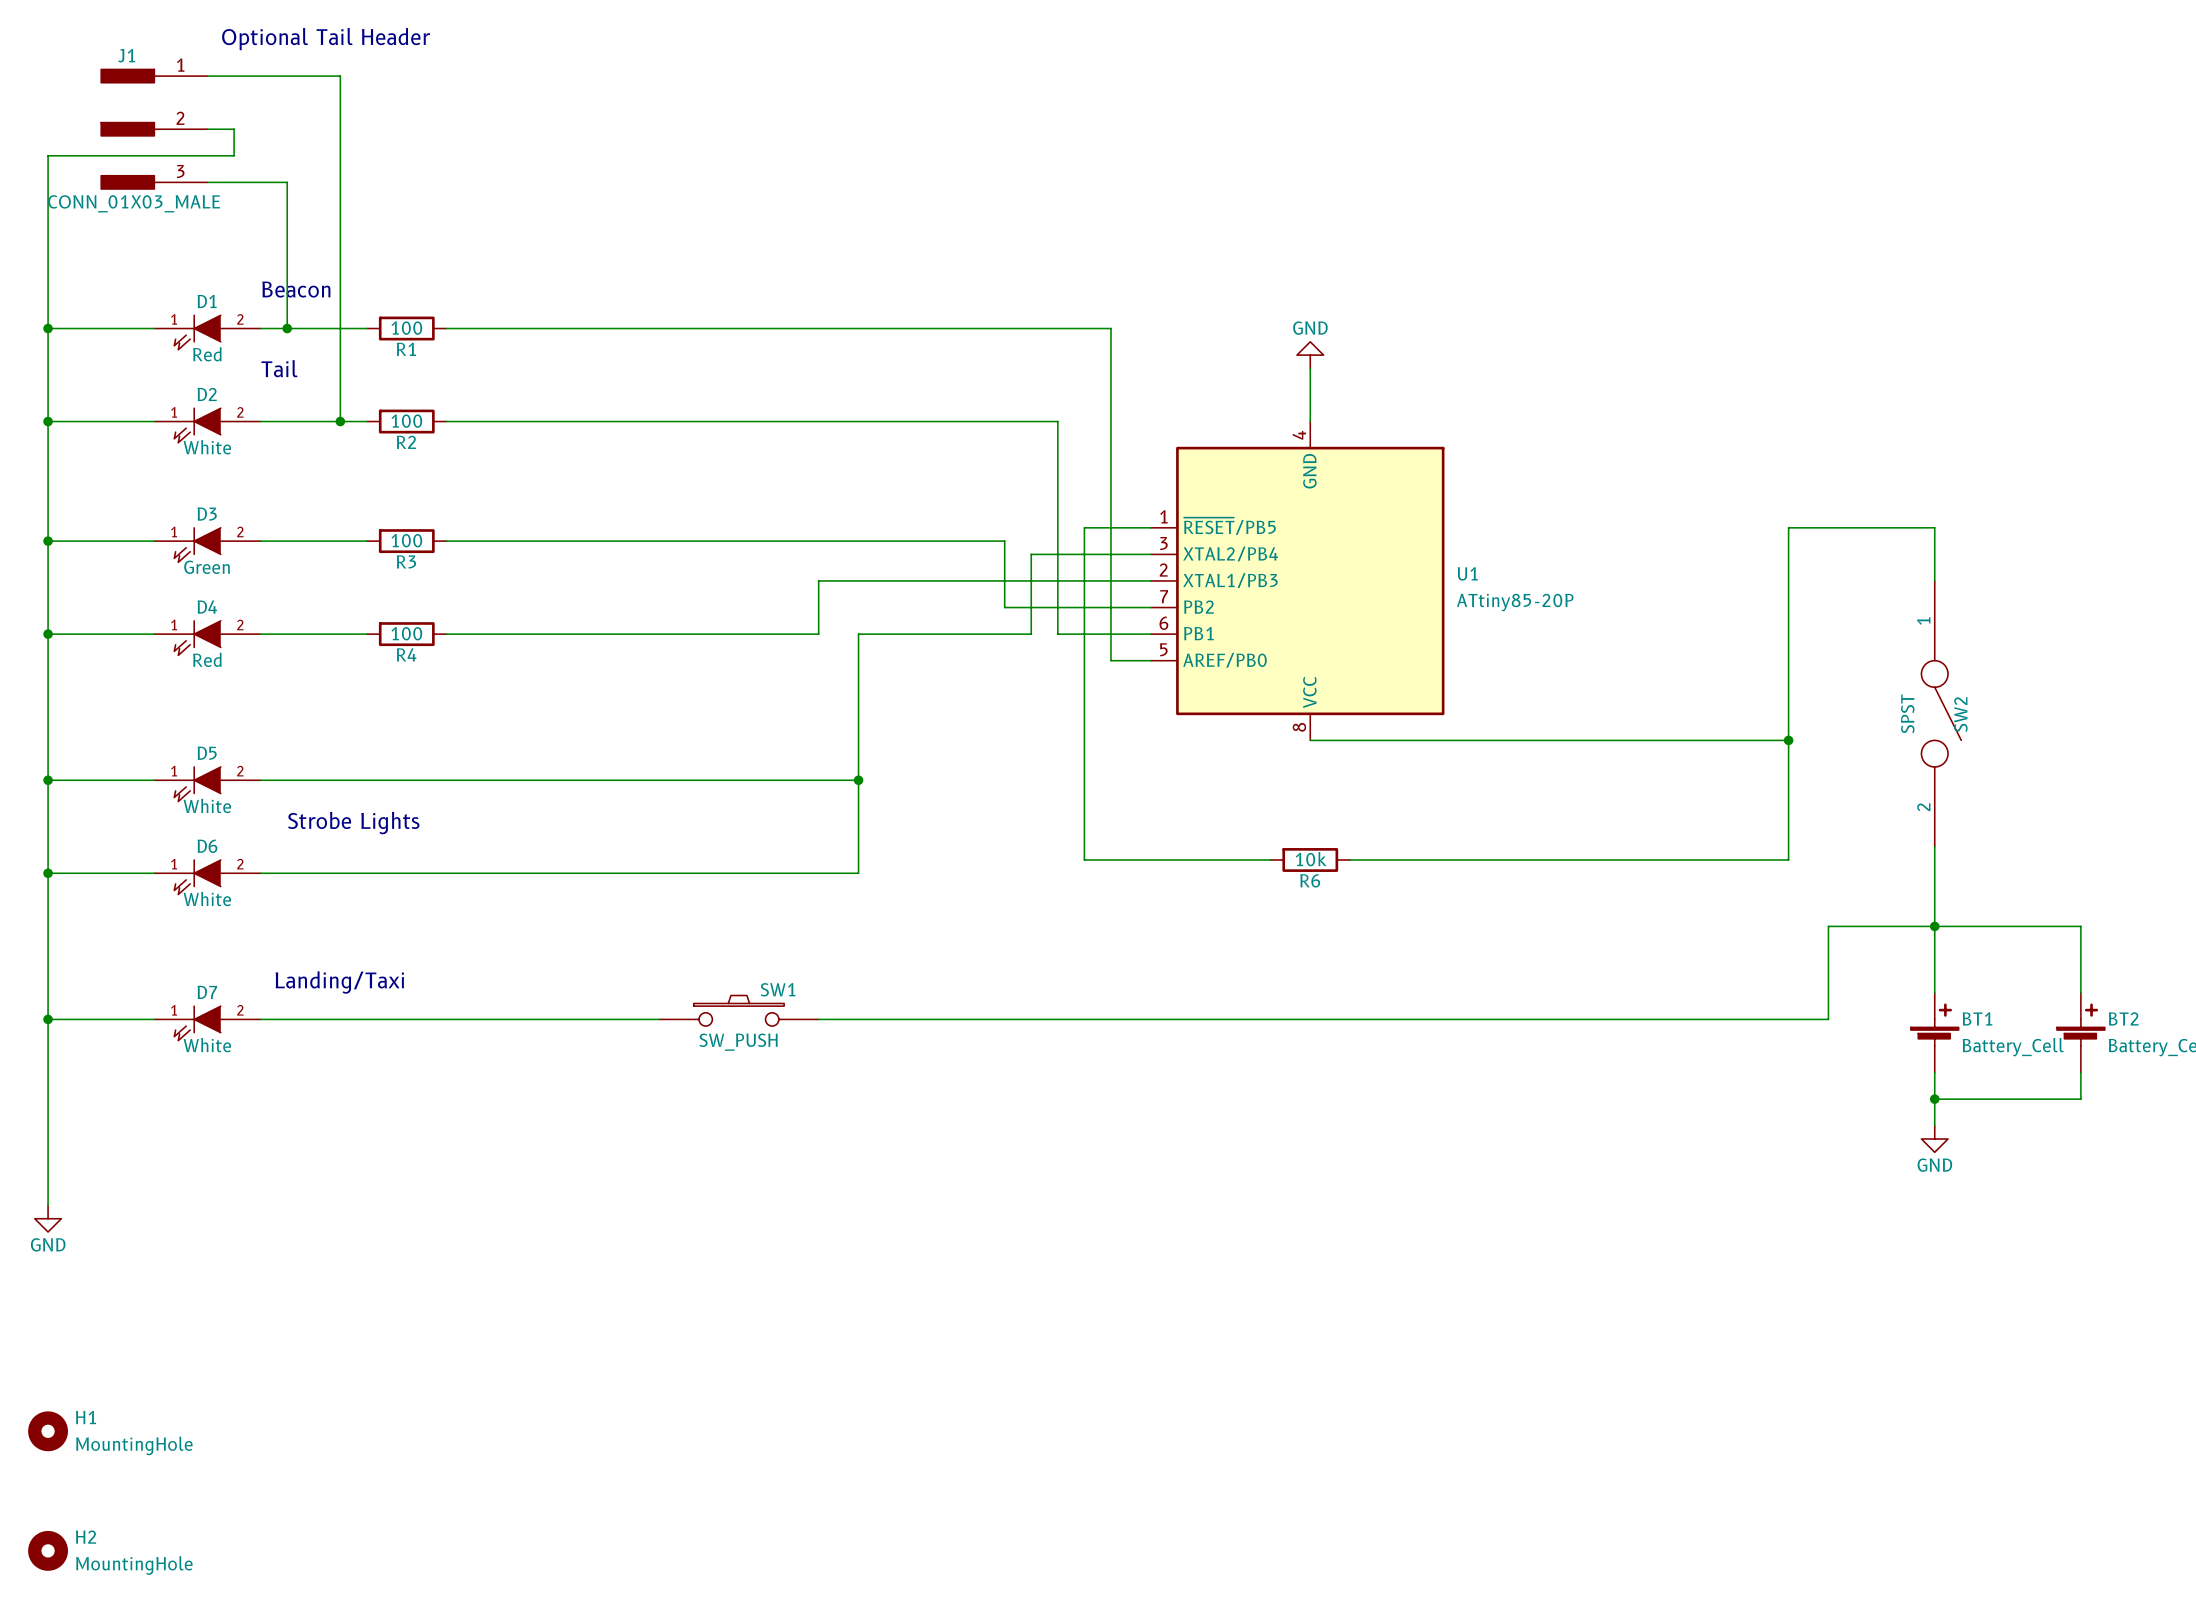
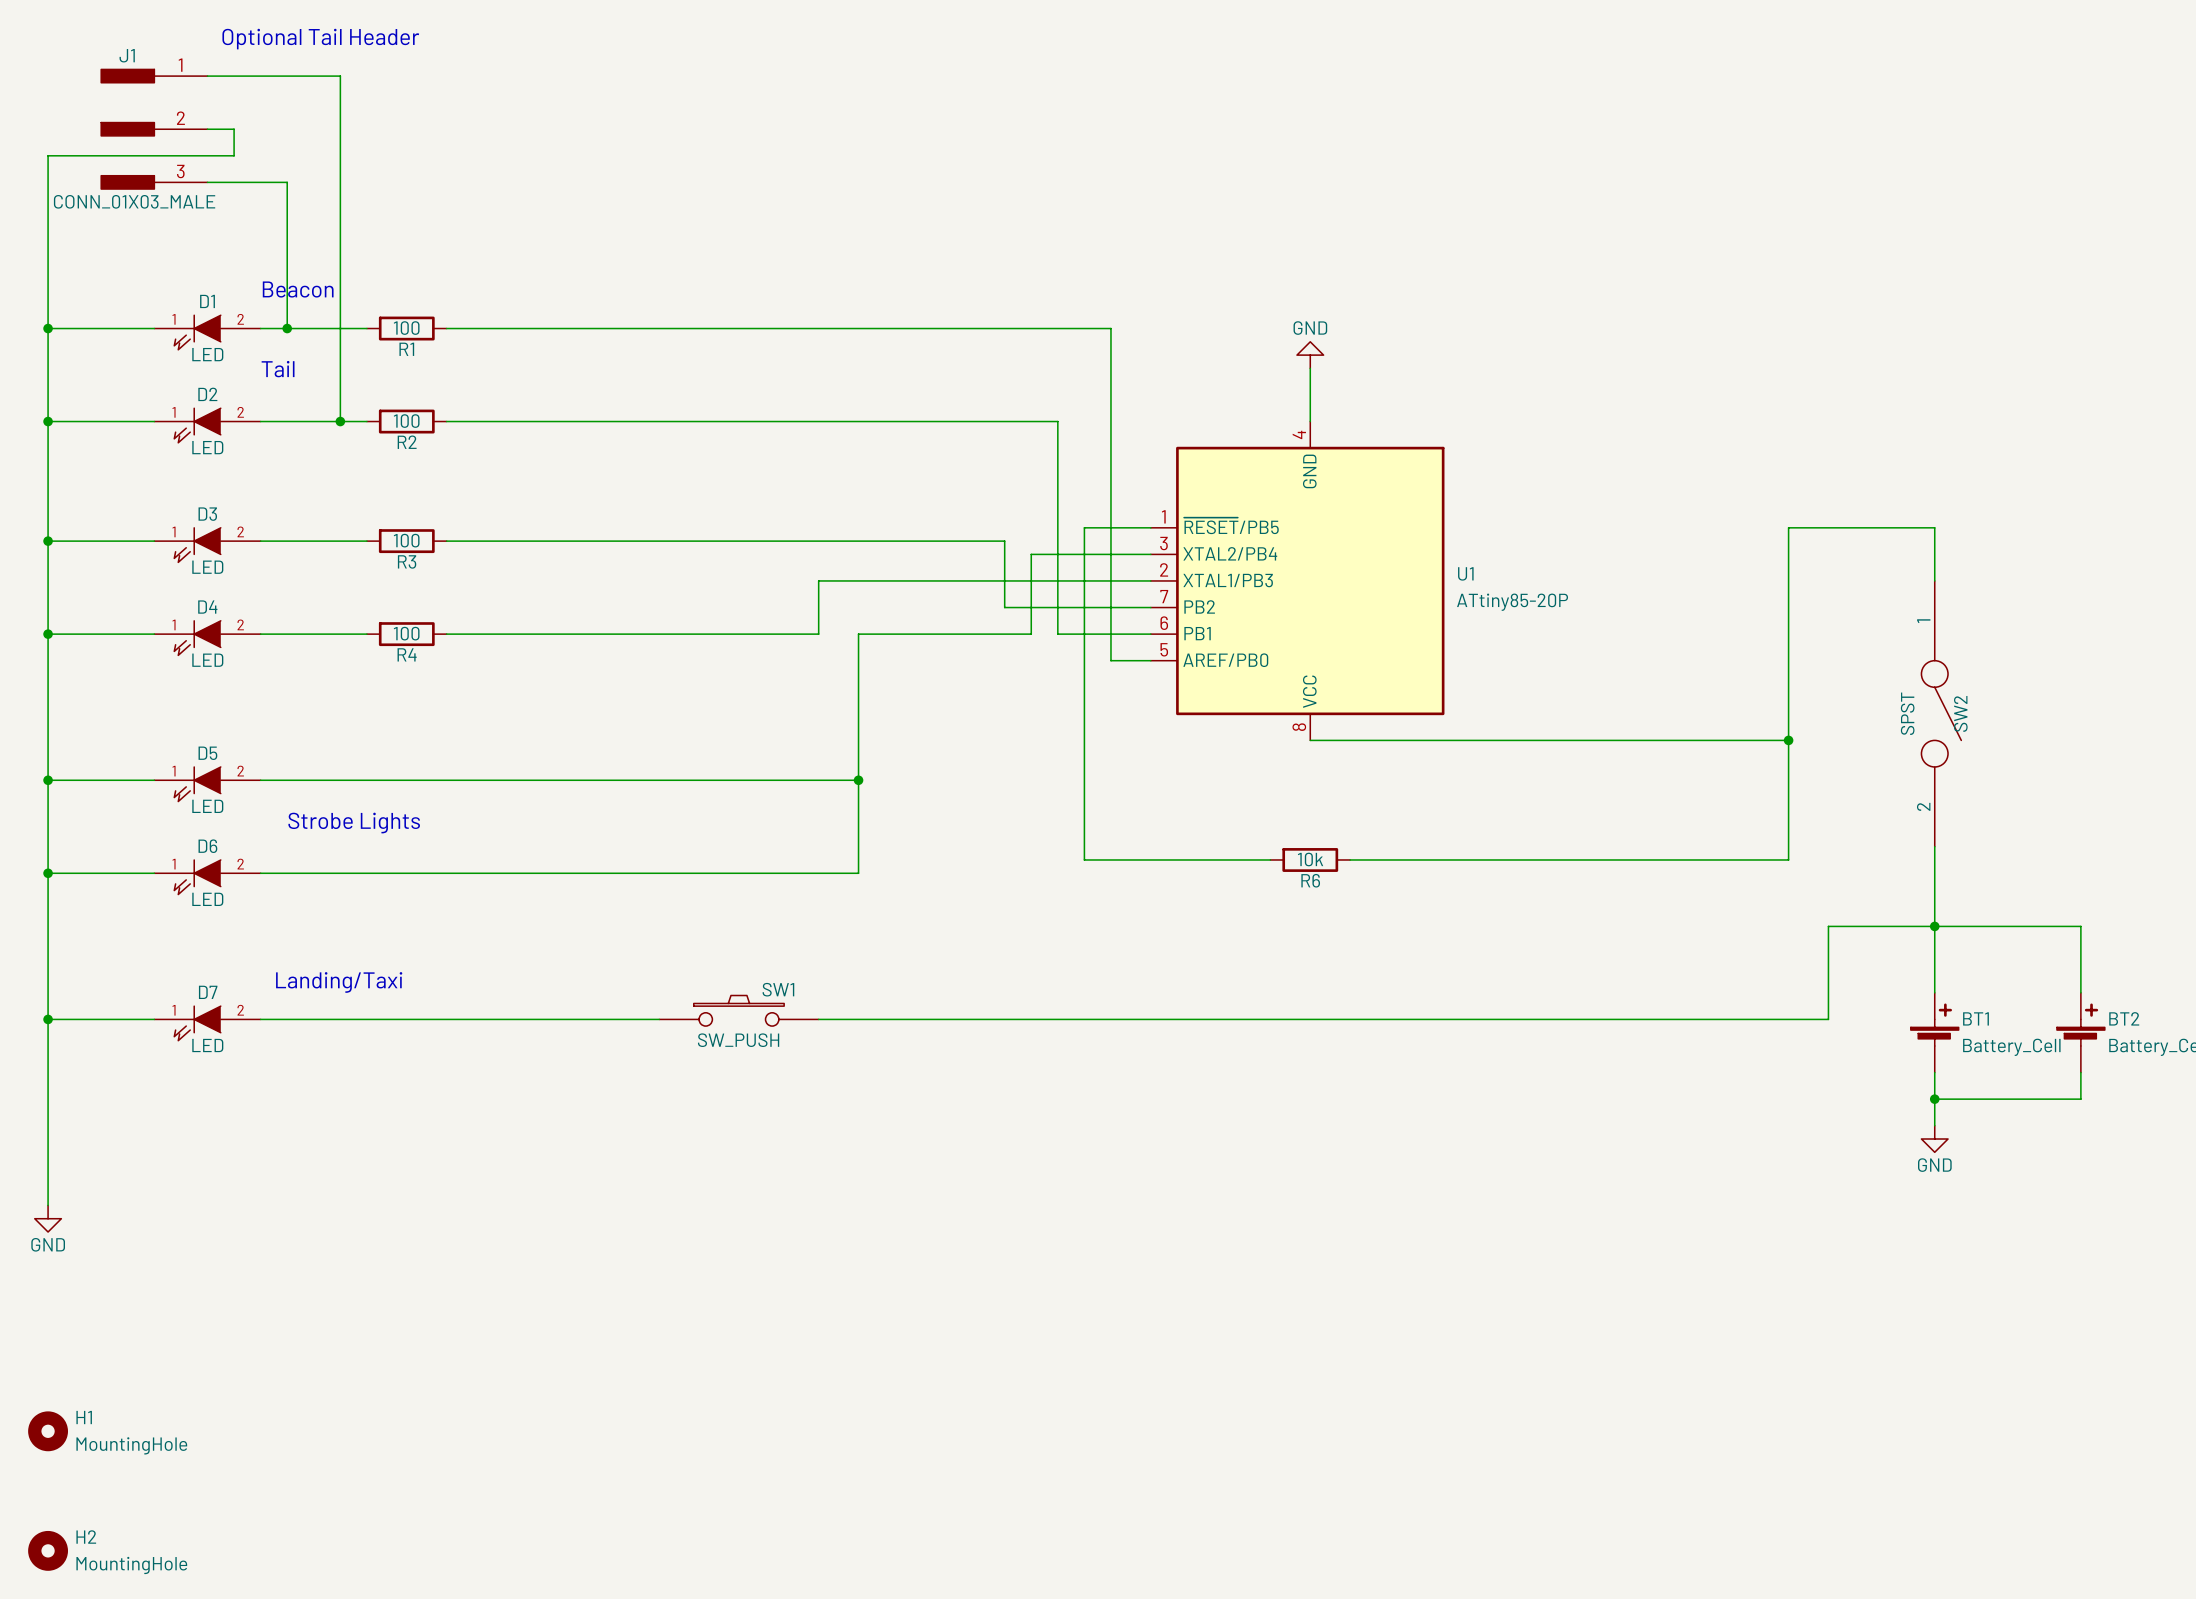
D1 value: Red (207, 354) -> LED (207, 354)
D2 value: White (207, 447) -> LED (207, 447)
D3 value: Green (207, 567) -> LED (207, 567)
D4 value: Red (207, 659) -> LED (207, 660)
D5 value: White (207, 805) -> LED (207, 806)
D6 value: White (207, 898) -> LED (207, 899)
D7 value: White (207, 1045) -> LED (207, 1045)

